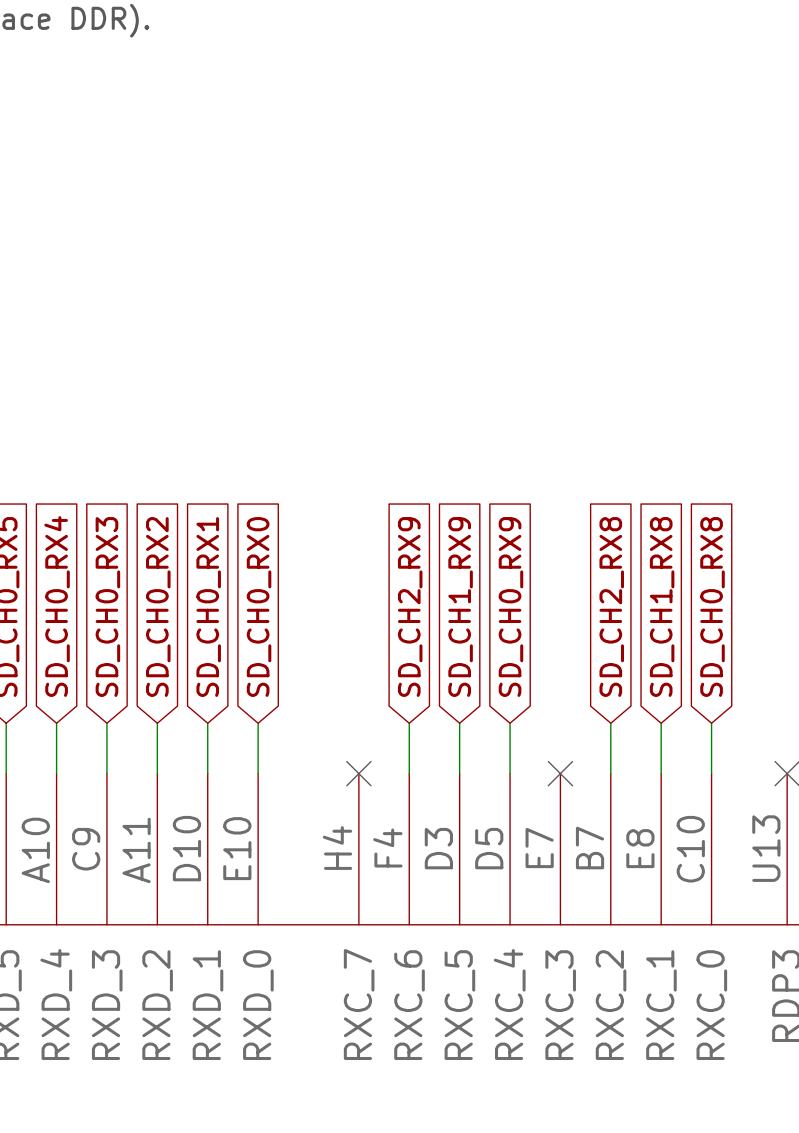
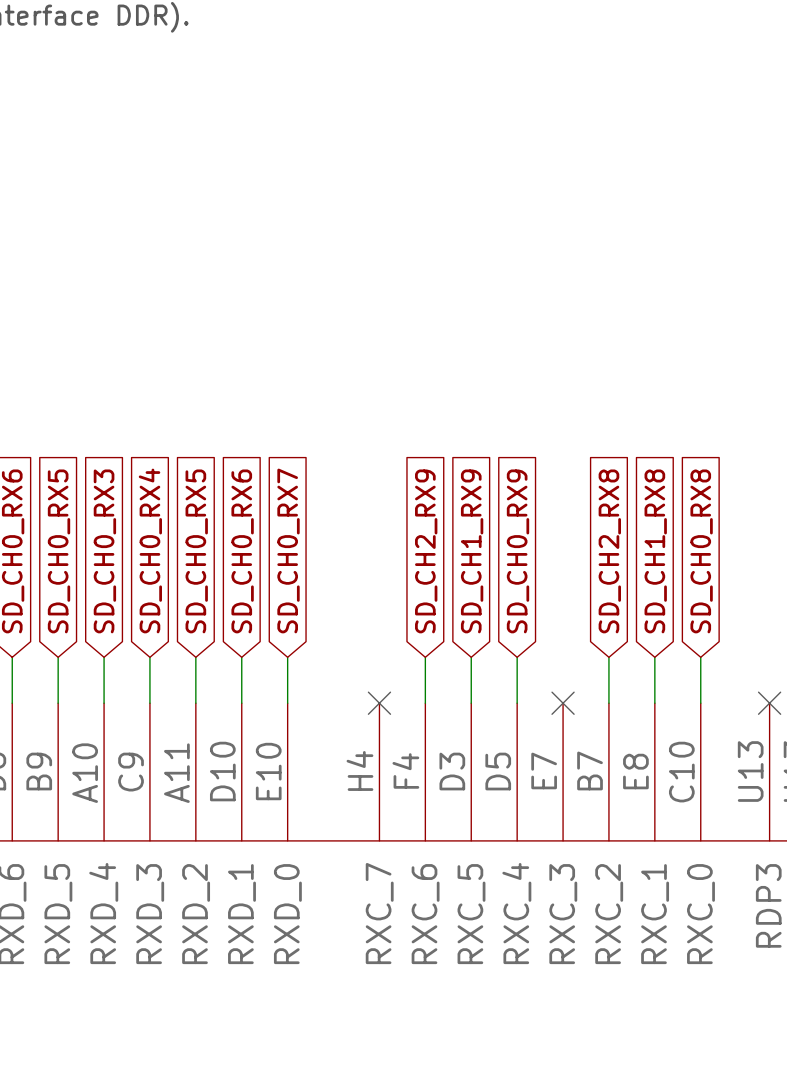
global label: SD_CH0_RX4 (57, 606) -> SD_CH0_RX3 (104, 551)
global label: SD_CH0_RX3 (107, 606) -> SD_CH0_RX4 (150, 550)
global label: SD_CH0_RX2 (158, 606) -> SD_CH0_RX5 (196, 551)
global label: SD_CH0_RX1 (208, 606) -> SD_CH0_RX6 (242, 551)
global label: SD_CH0_RX0 (259, 606) -> SD_CH0_RX7 (288, 550)

